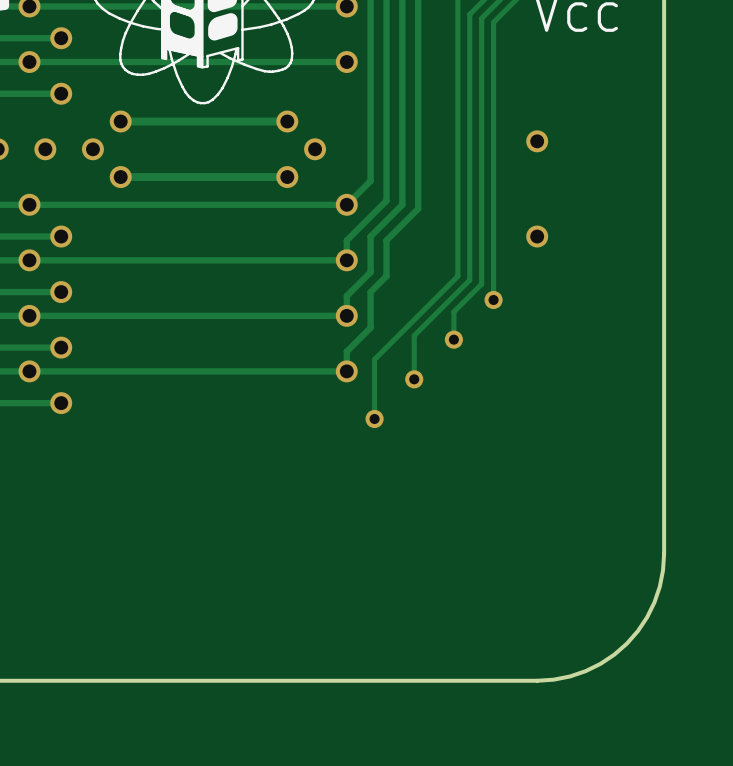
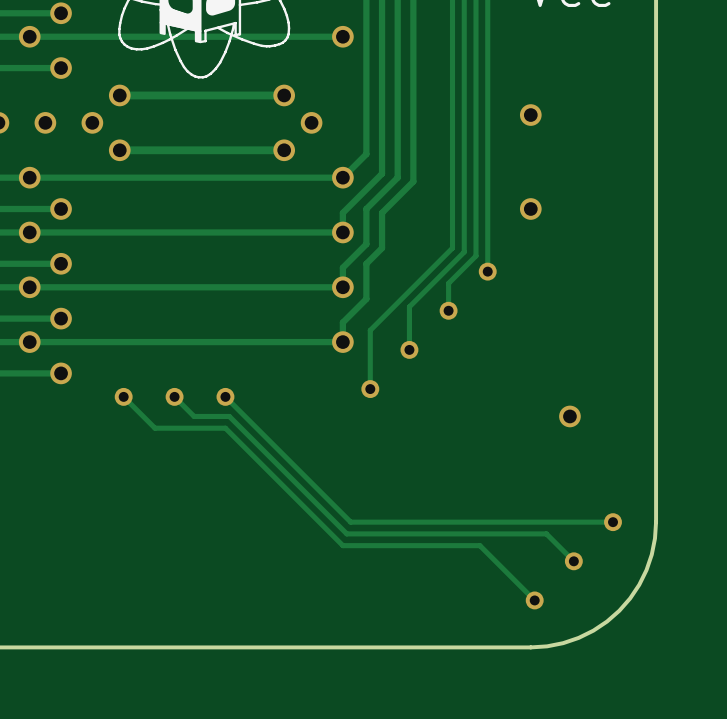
track: none -> (123, 396) (155, 428) (225, 428) (342, 545) (479, 545) (534, 600)
via: none -> (123, 396)
track: none -> (174, 396) (194, 416) (229, 416) (346, 533) (546, 533) (573, 561)
via: none -> (174, 396)
track: none -> (225, 396) (350, 522) (613, 522)
via: none -> (225, 396)
via: none -> (569, 416)
via: none -> (613, 522)
via: none -> (573, 561)
via: none -> (534, 600)

